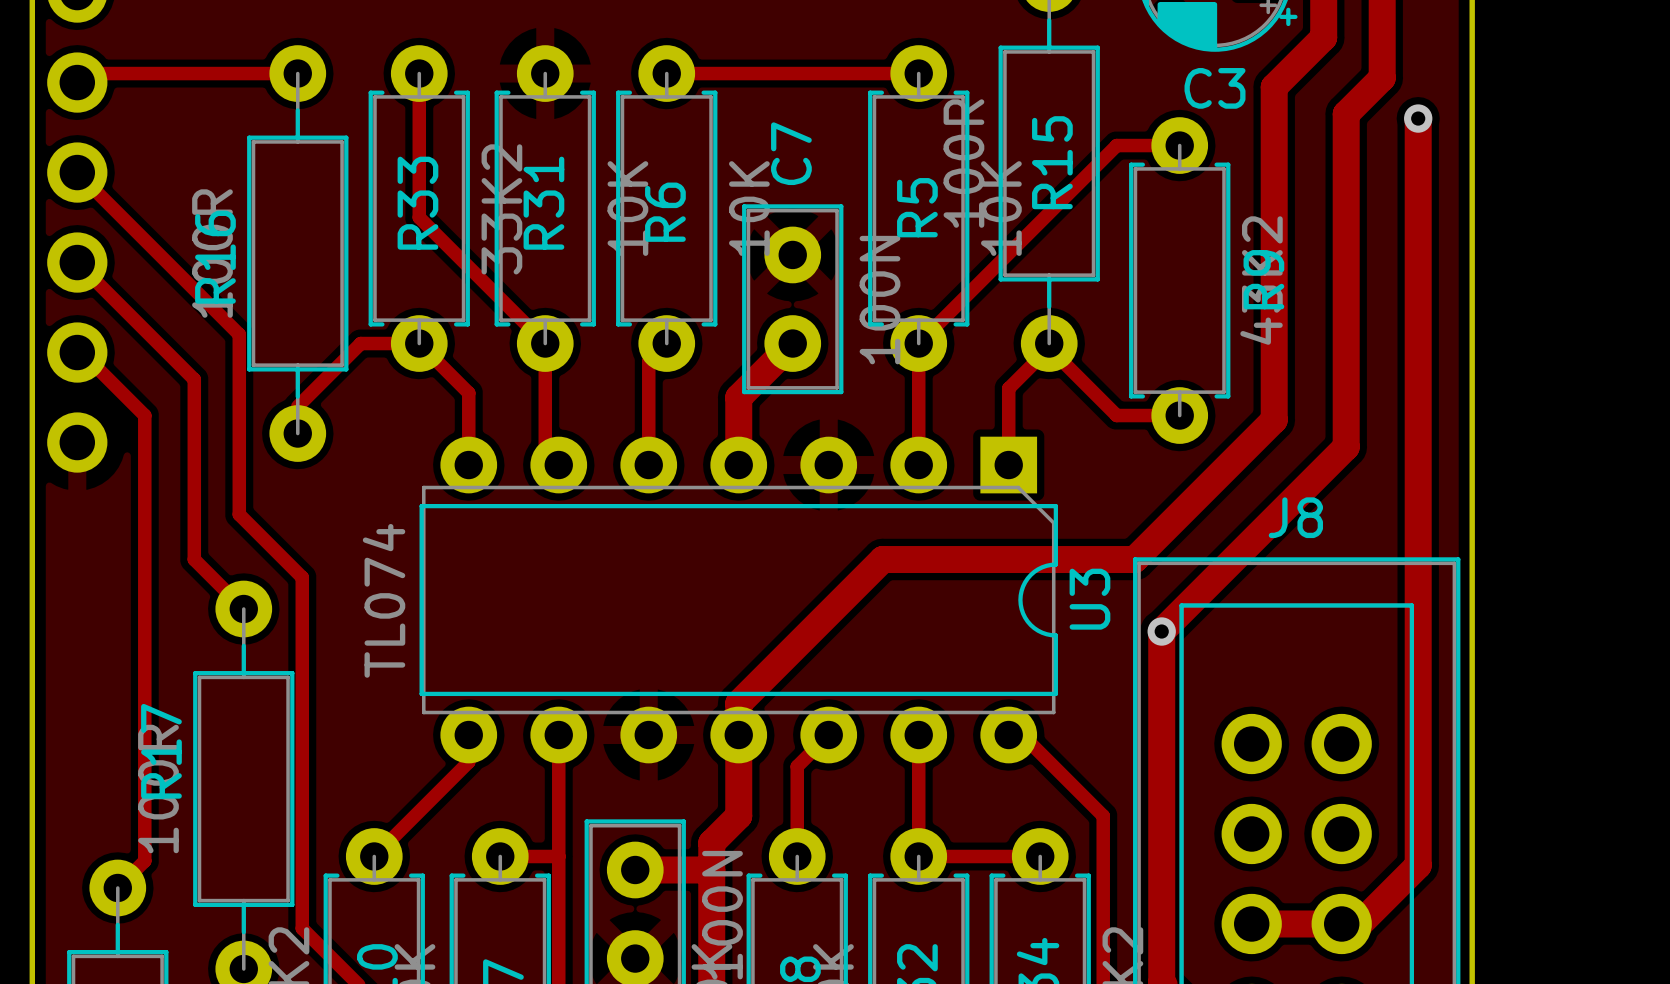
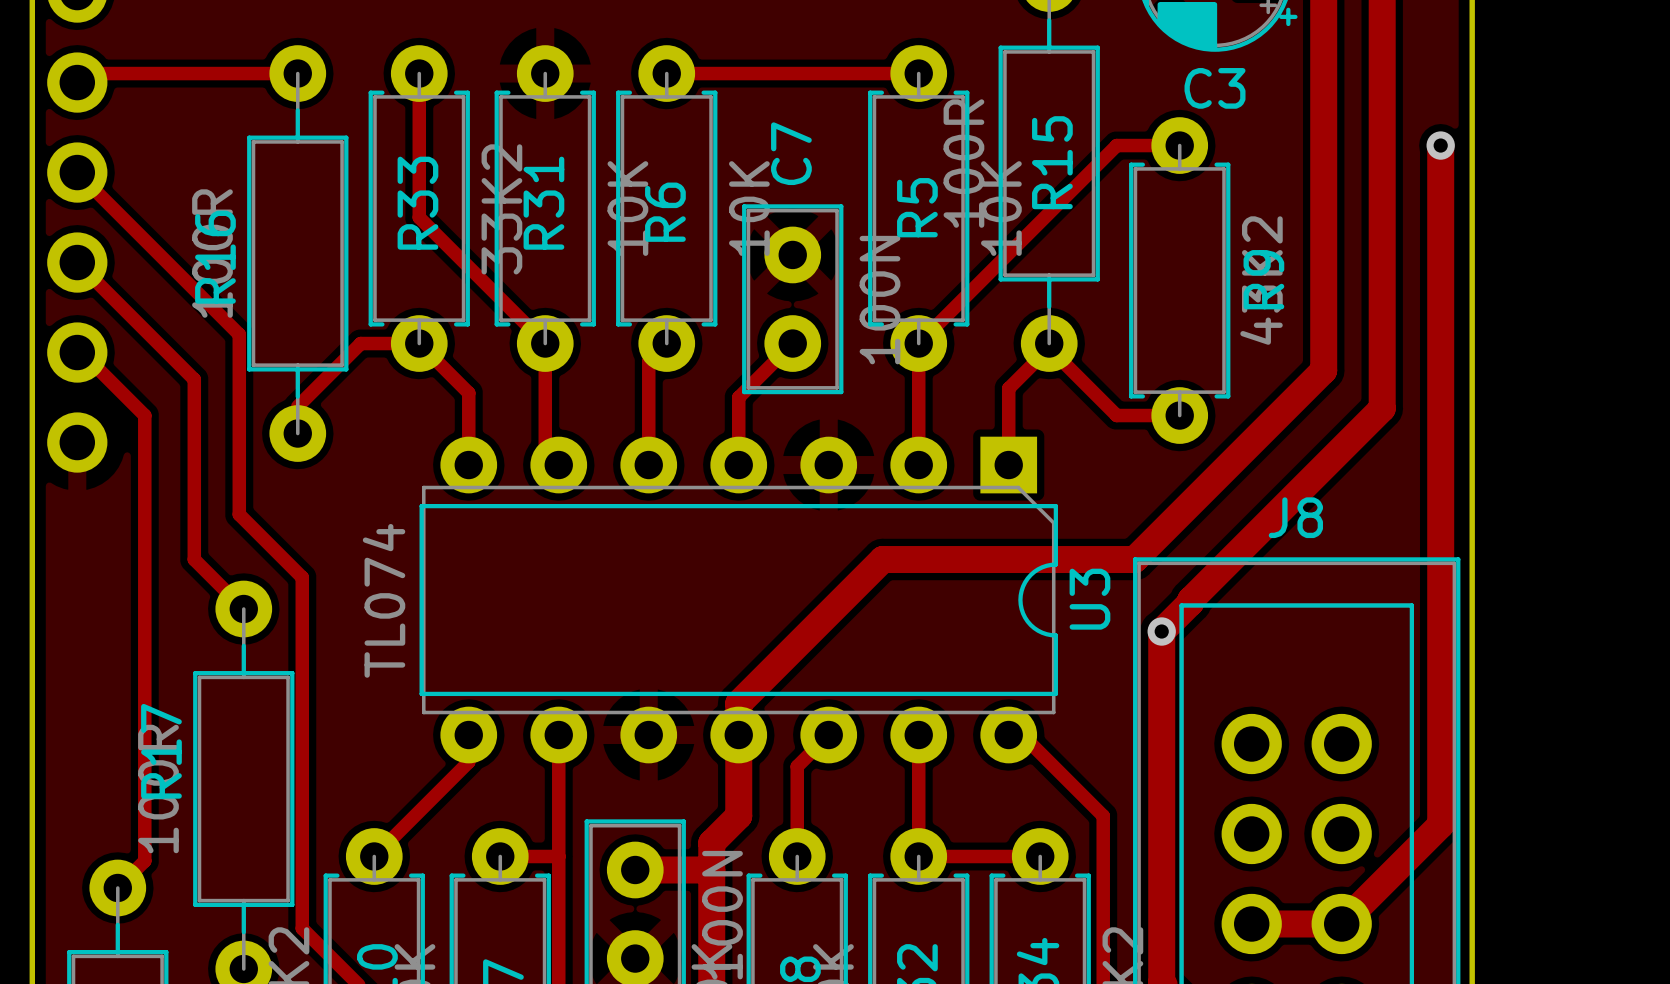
track: (1323, 37) (1274, 87) (1274, 420) -> (1323, 37) (1323, 370) (1274, 420)
track: (1382, 78) (1346, 114) (1346, 447) (1190, 602) -> (1382, 78) (1382, 408) (1190, 600) (1190, 602)
track: (1418, 118) (1418, 865) (1359, 923) (1341, 923) -> (1440, 145) (1440, 825) (1341, 923)
via position: (1418, 118) -> (1440, 145)
track width: thick (792, 343) (738, 397) (738, 465) -> thin (792, 343) (738, 397) (738, 465)

